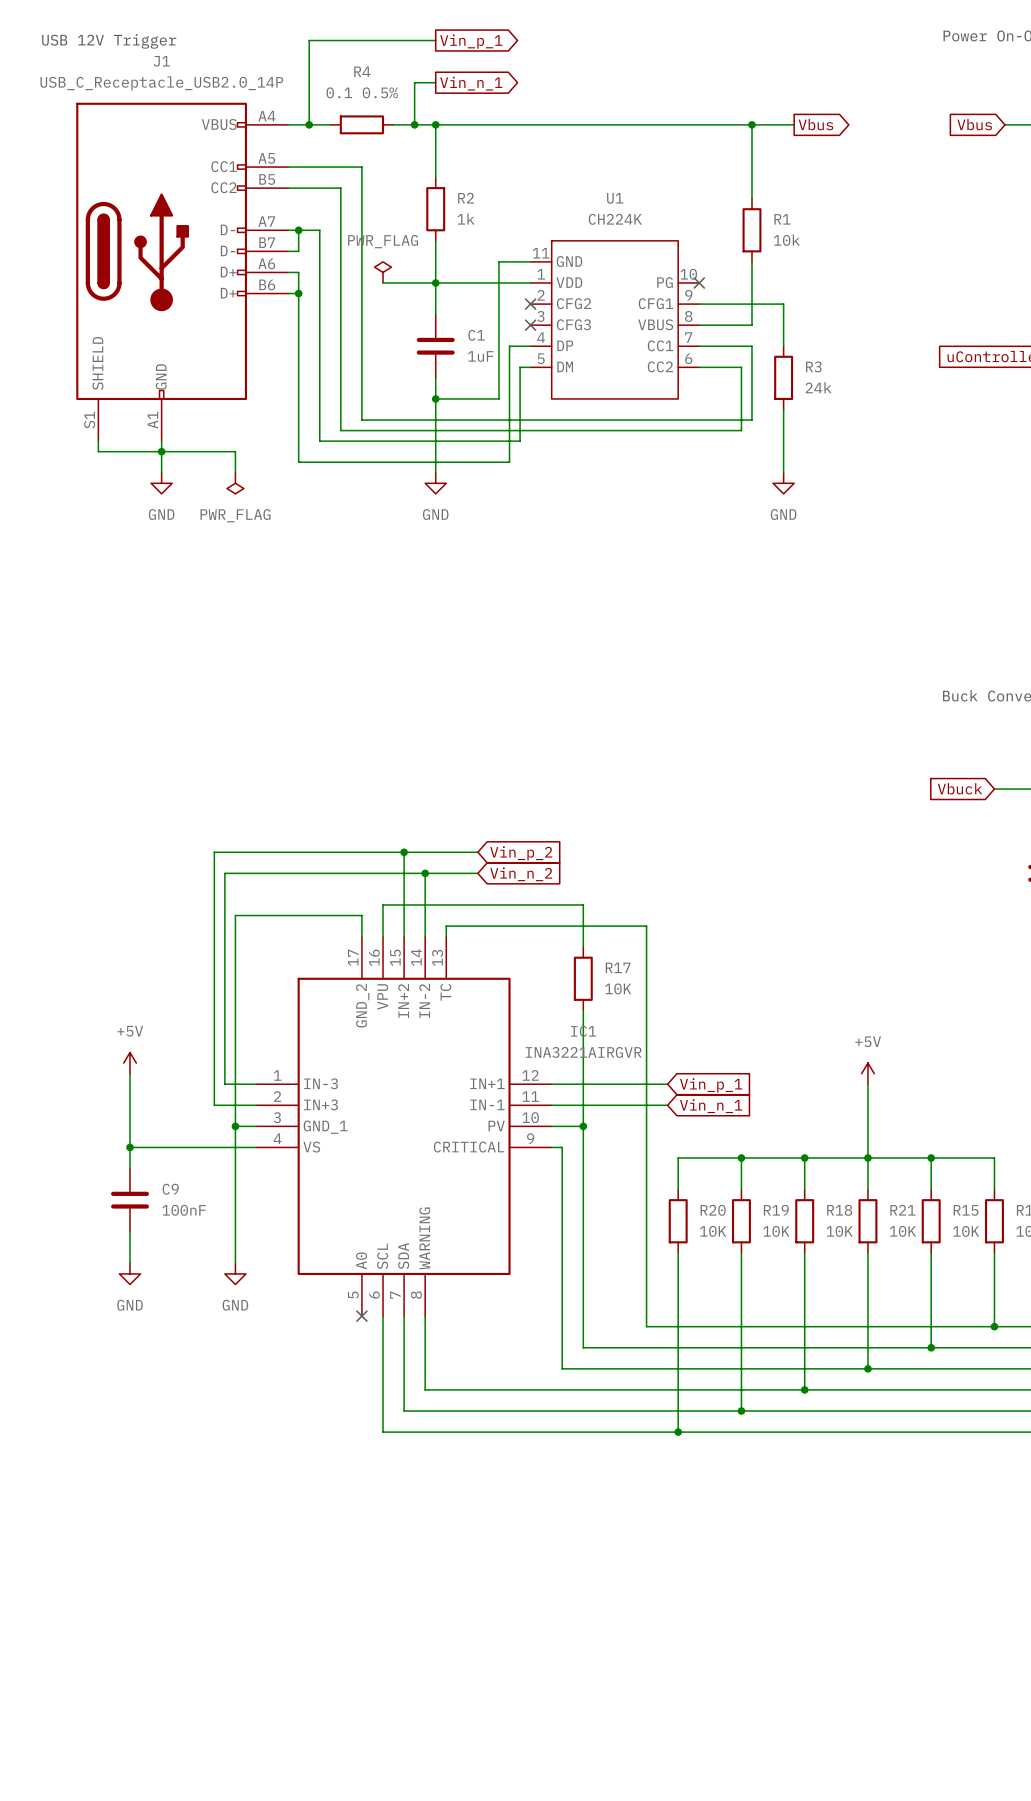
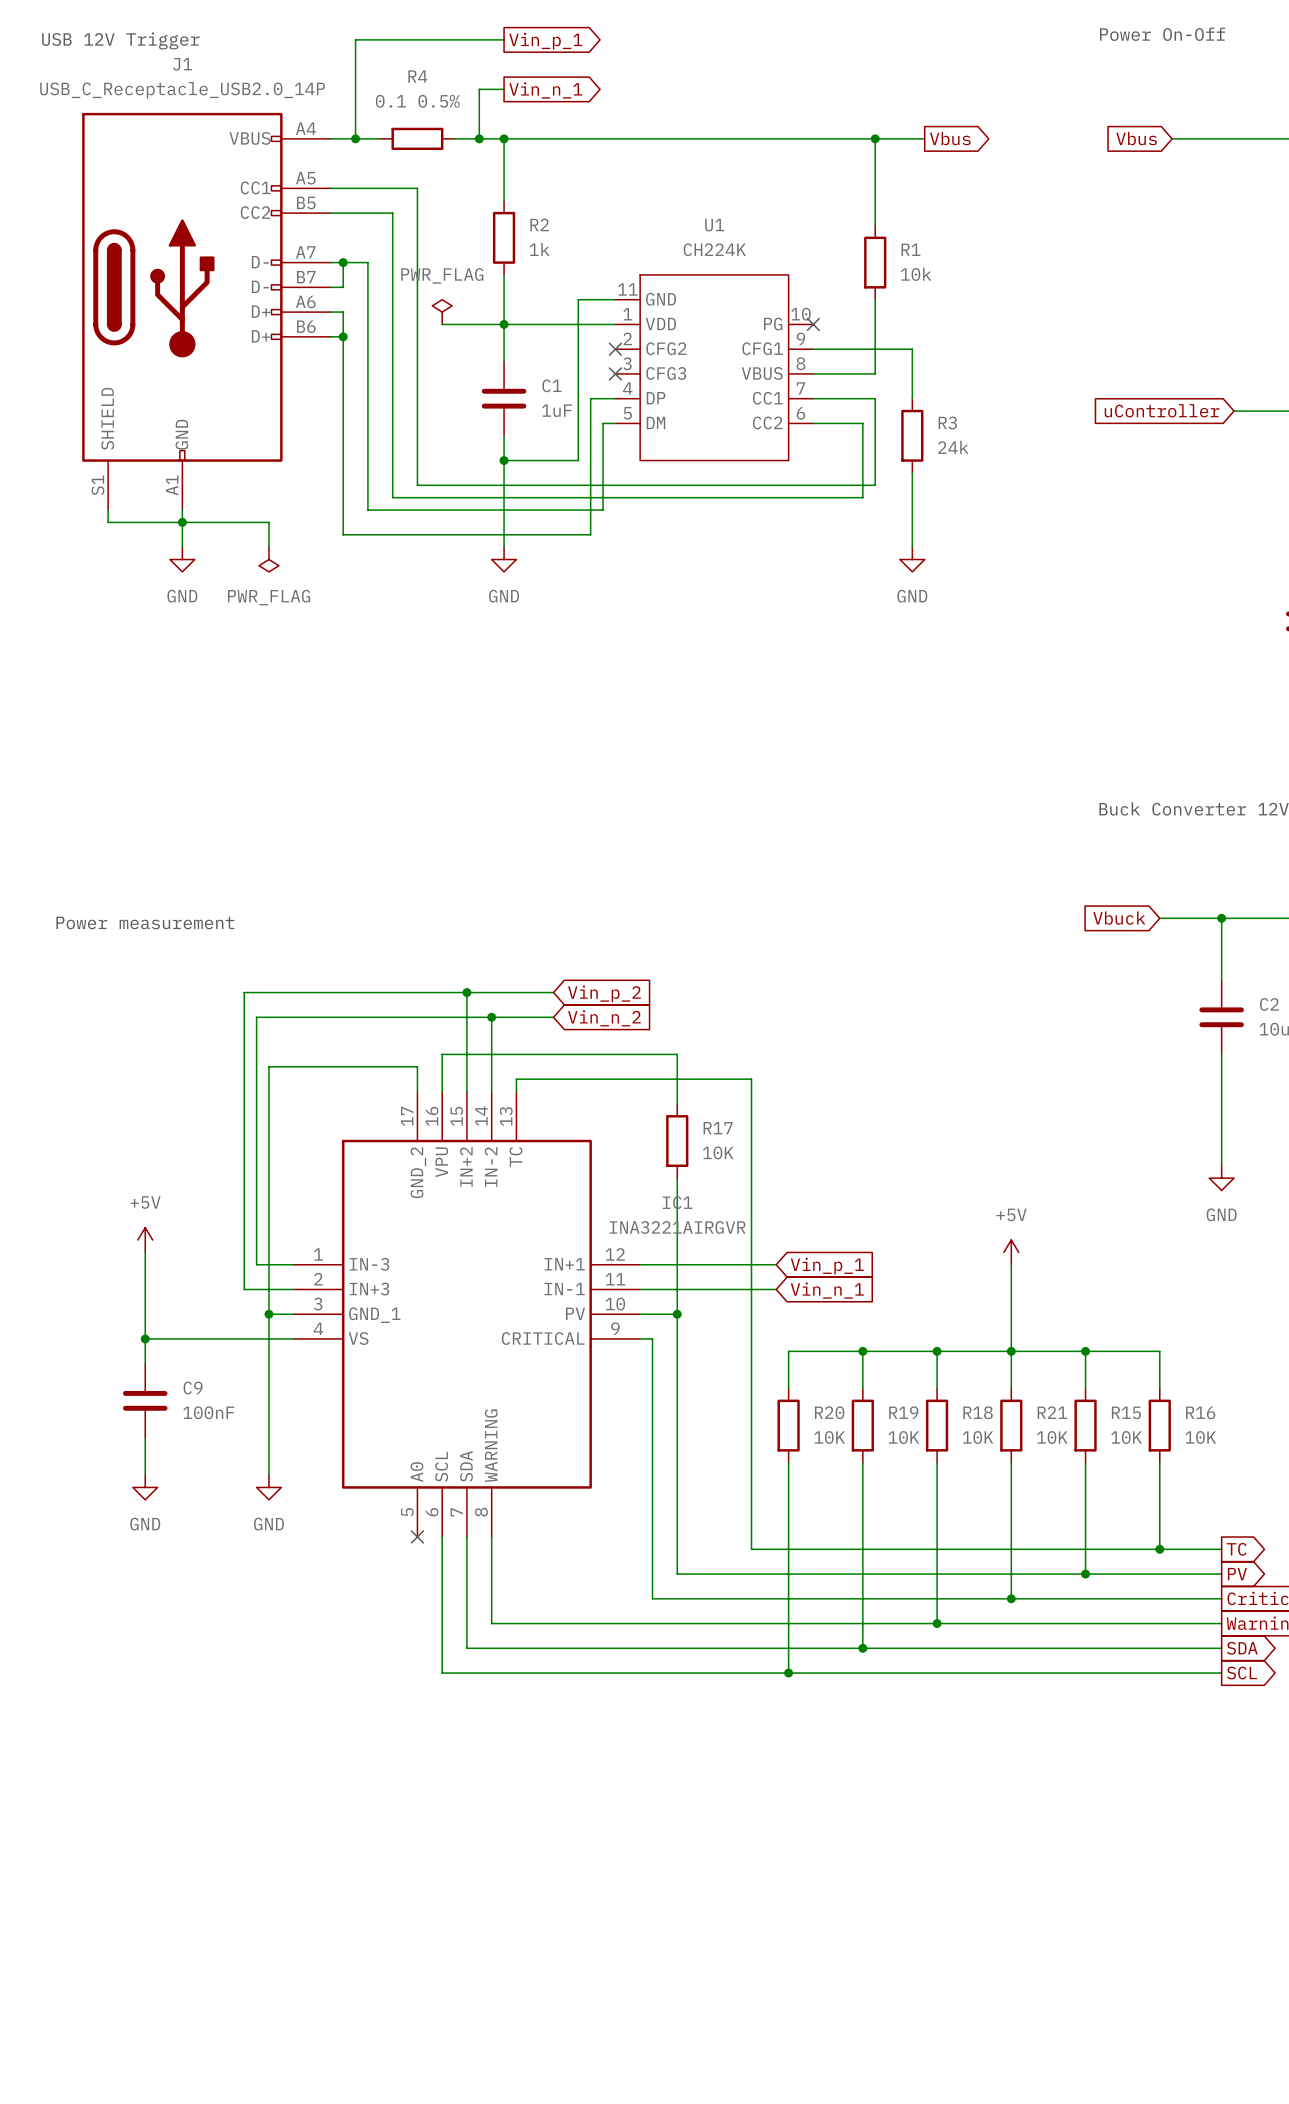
text: none -> Power measurement (145, 922)

